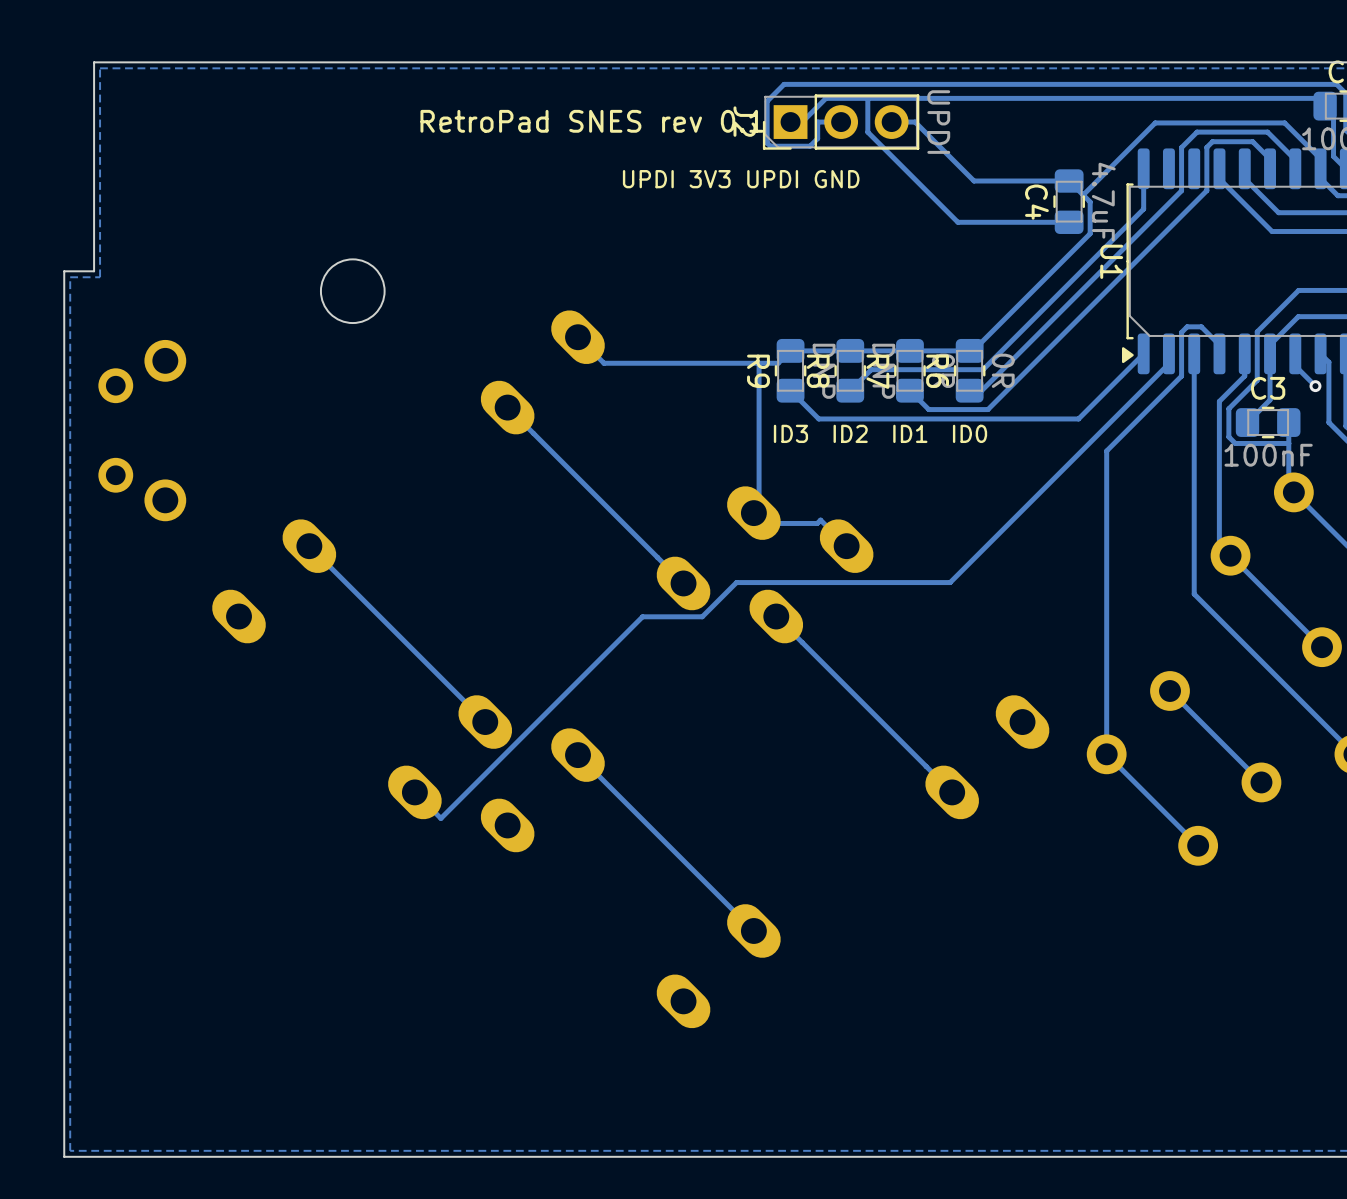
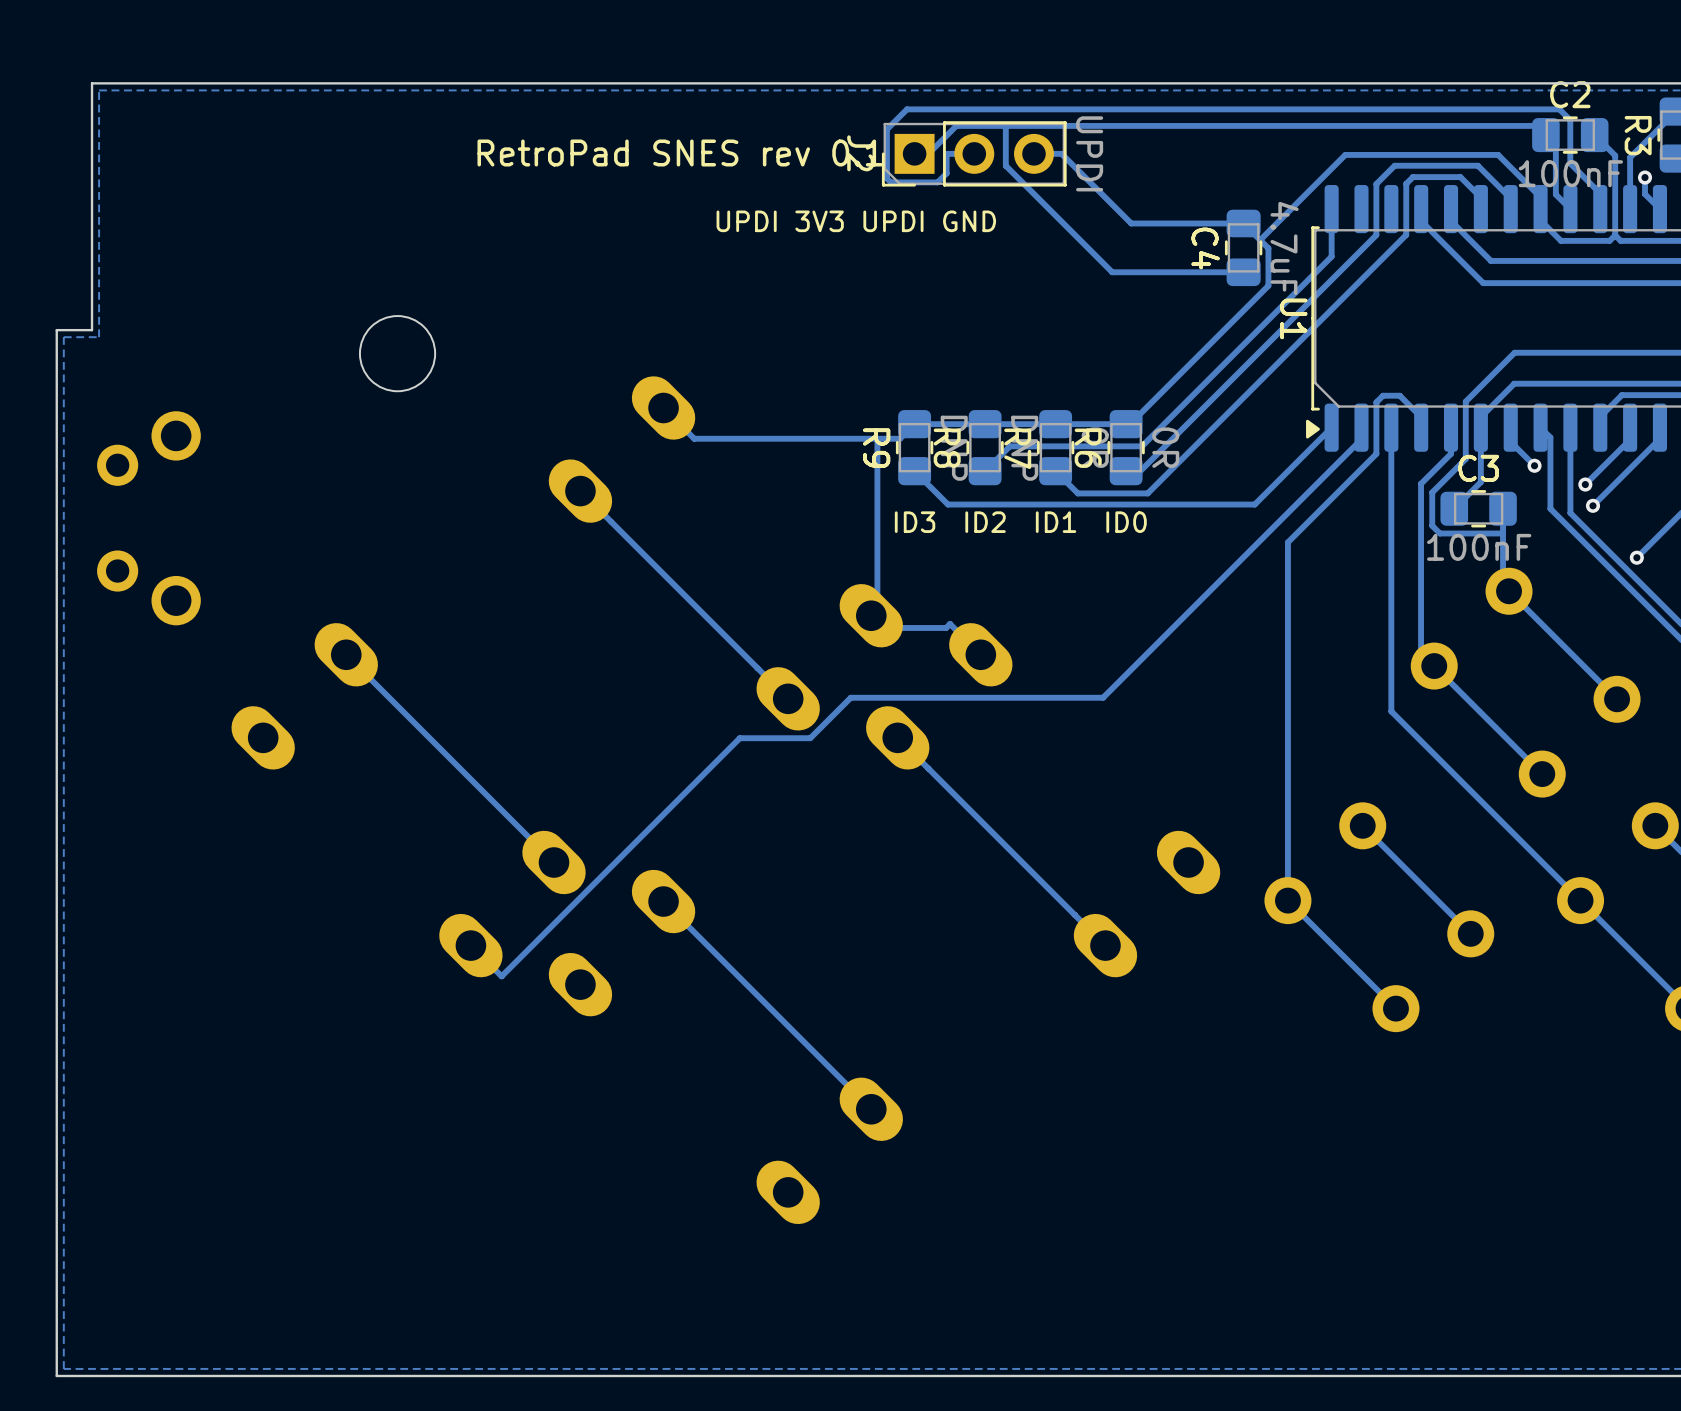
text: none -> C4 (1205, 248)
text: none -> U1 (1293, 318)
text: none -> R9 (876, 448)
text: none -> C3 (1478, 468)

